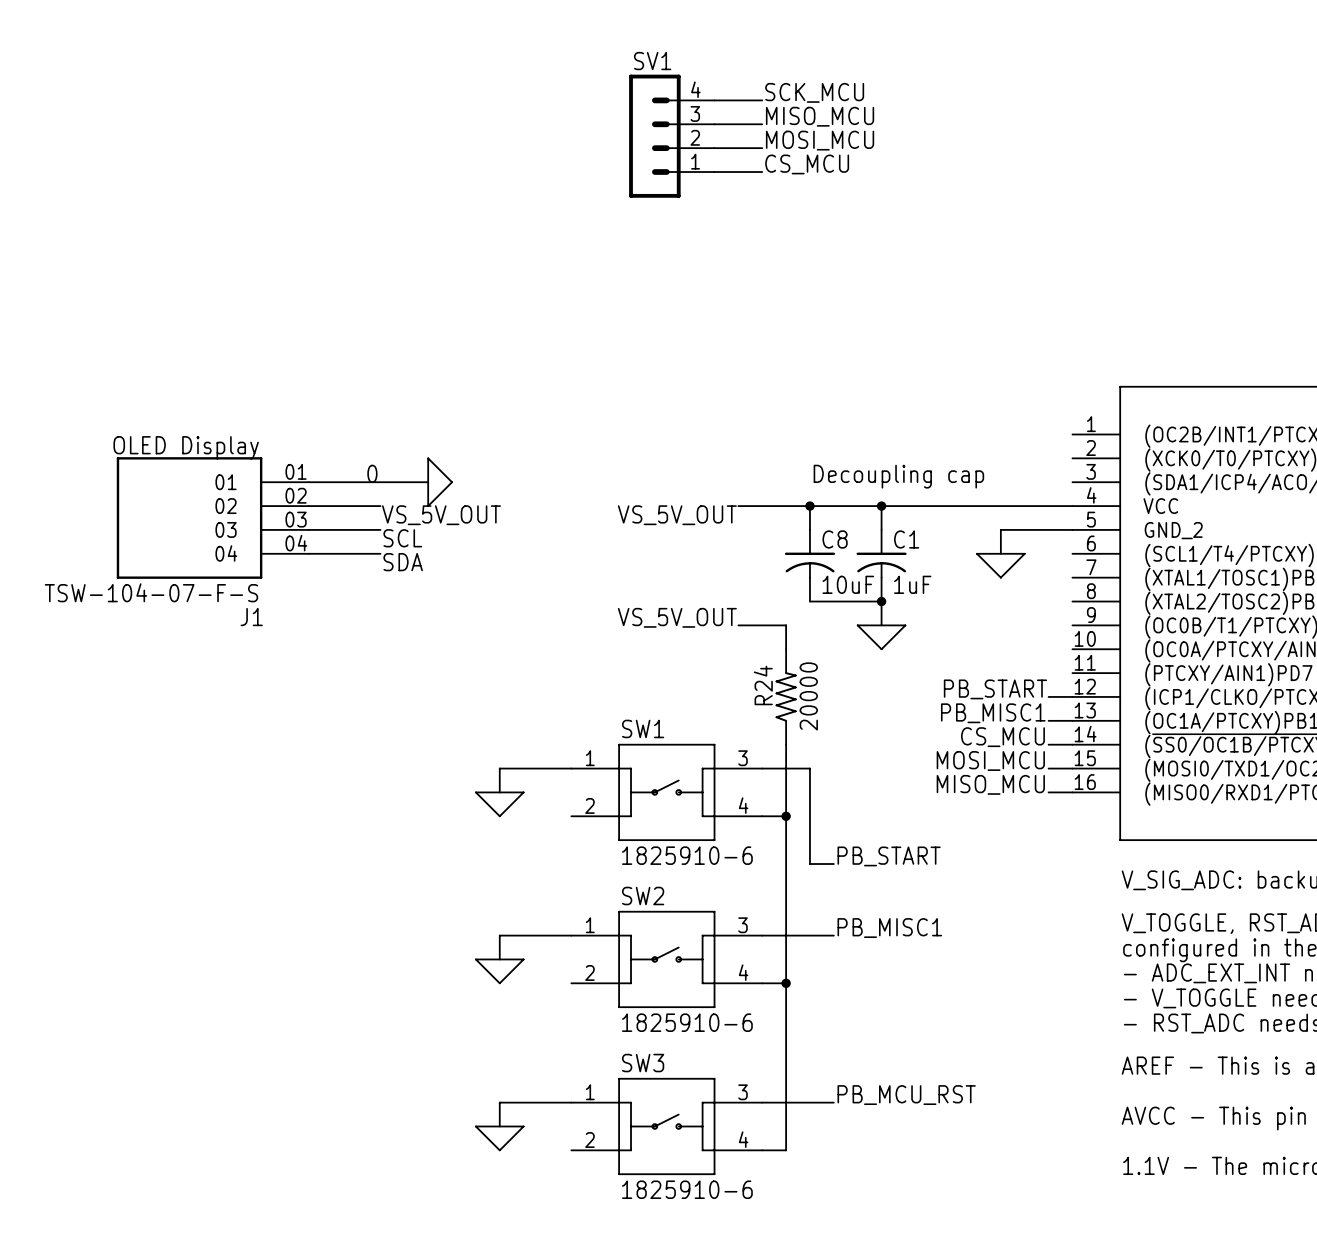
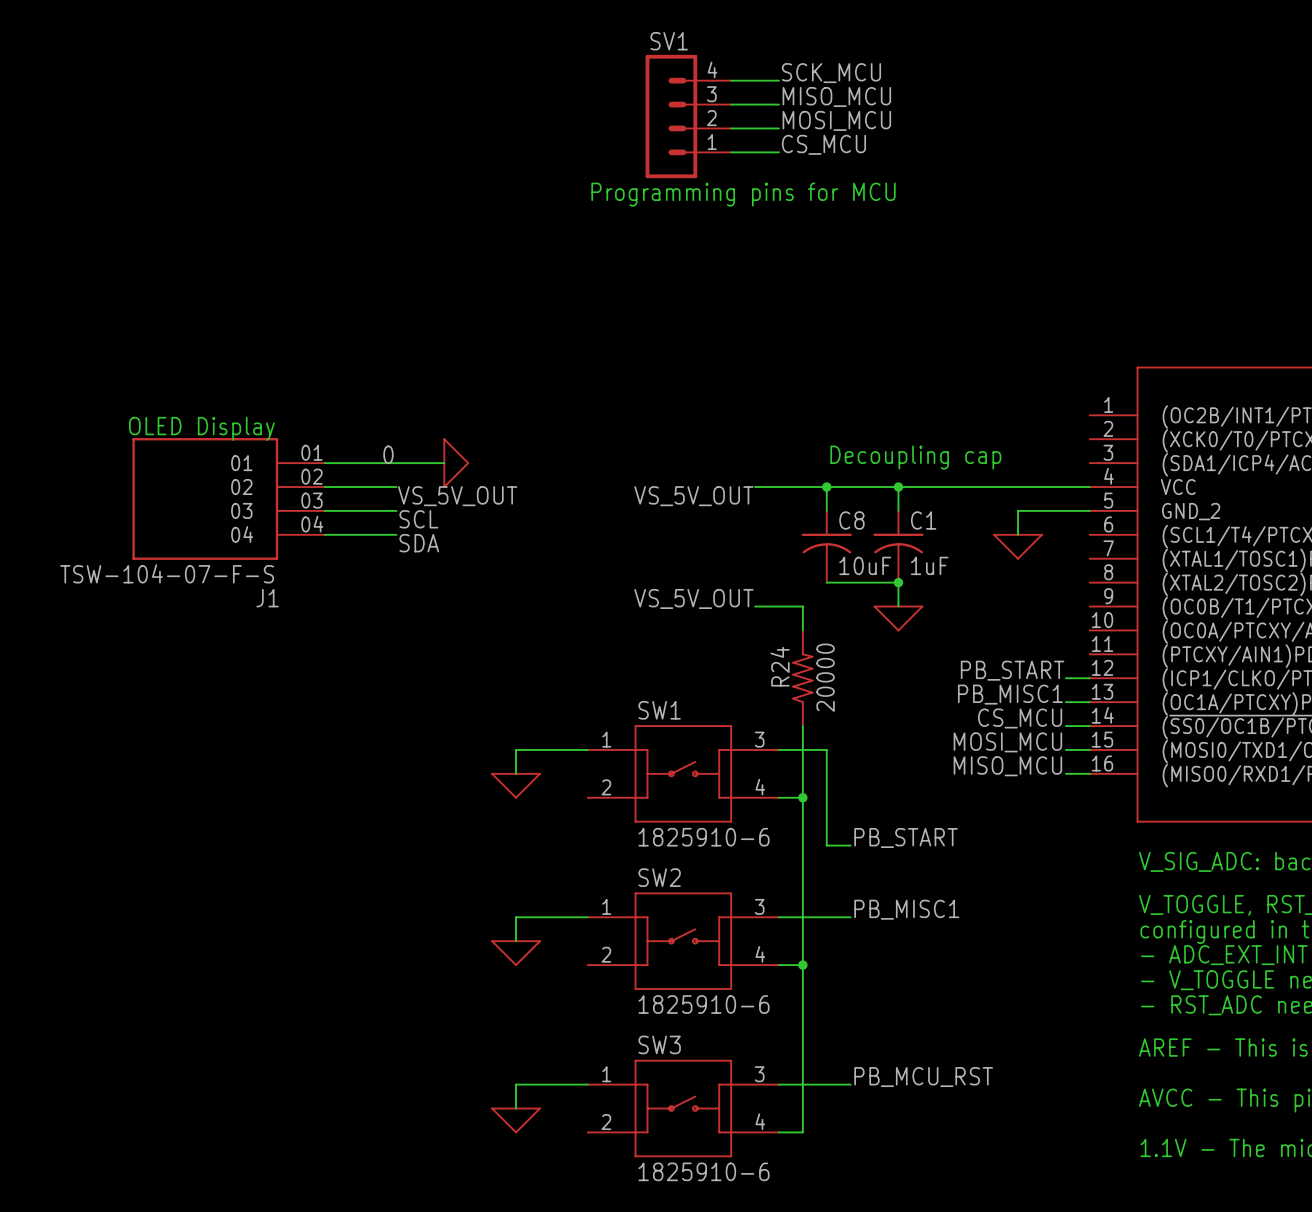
text: none -> Programming pins for MCU (743, 194)

